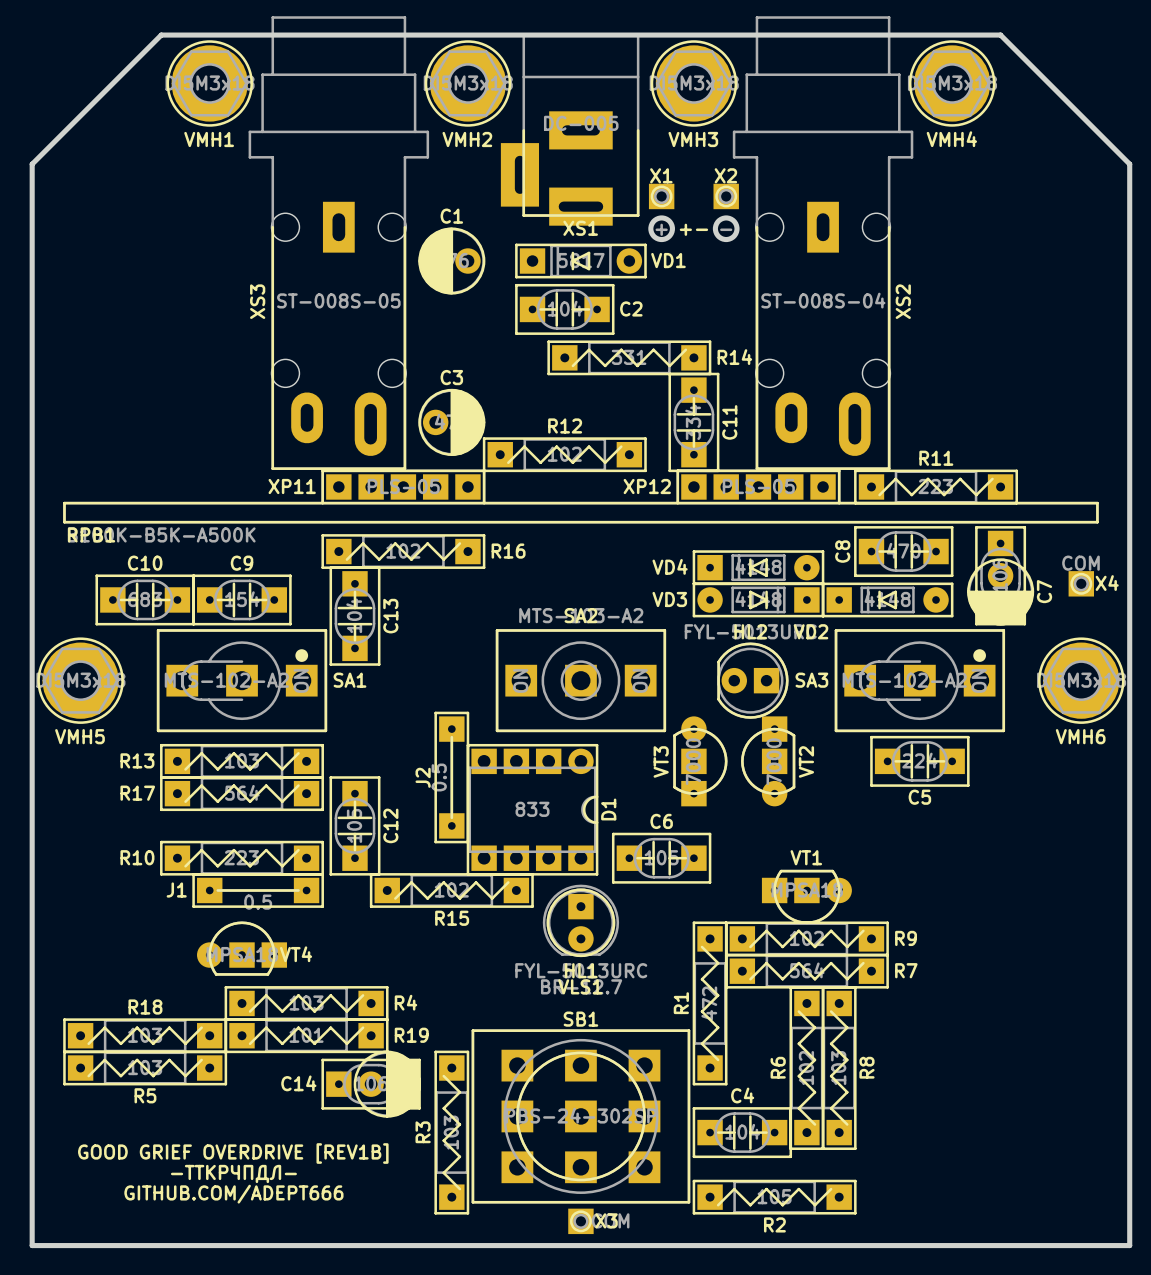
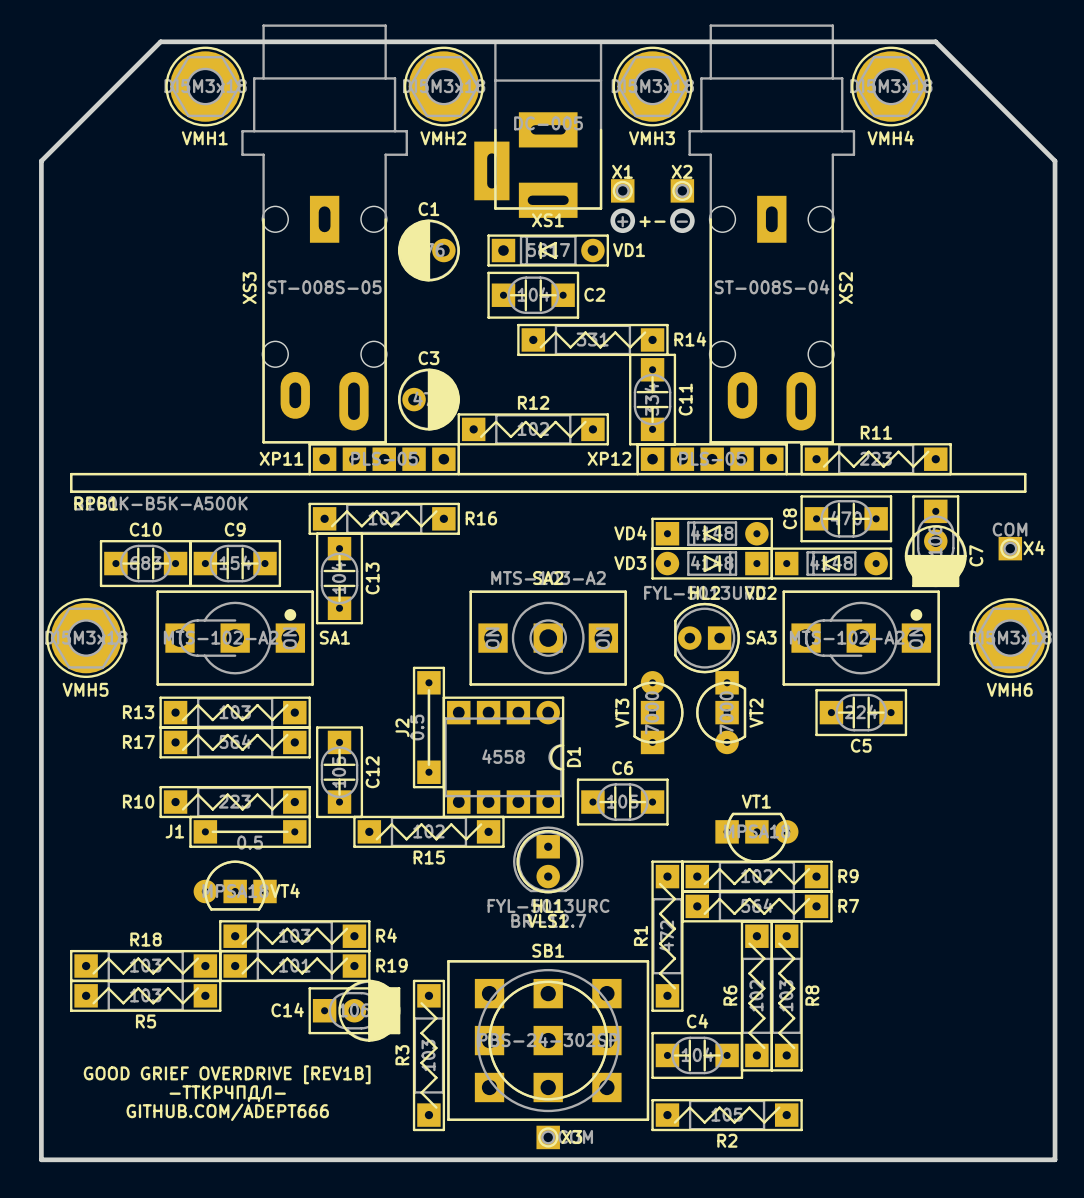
D1 value: 833 (532, 809) -> 4558 (503, 756)

